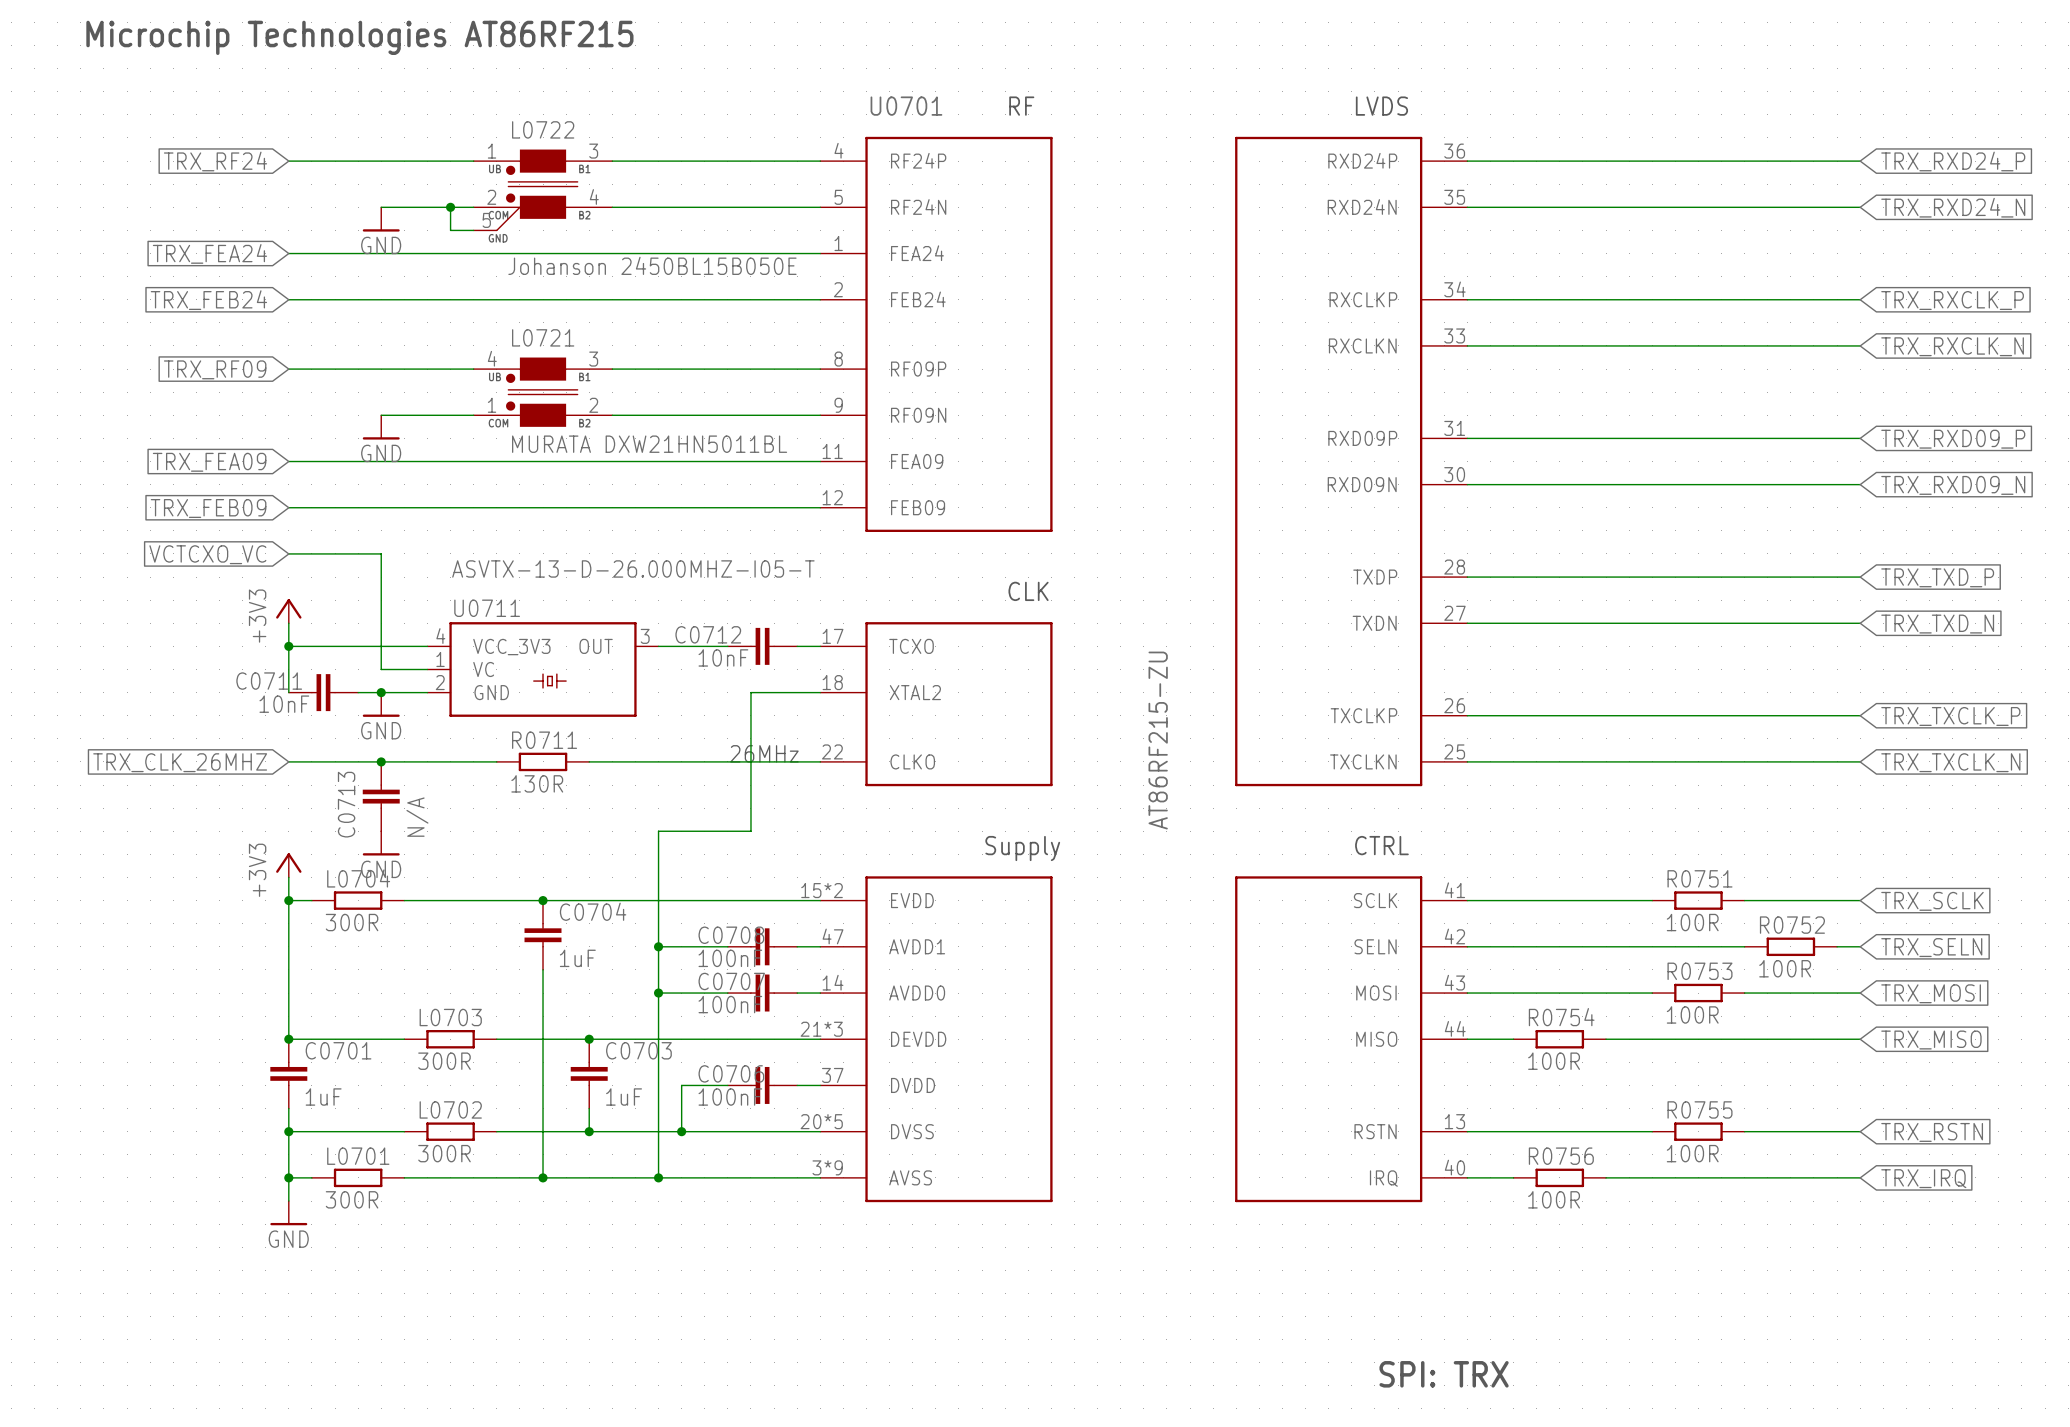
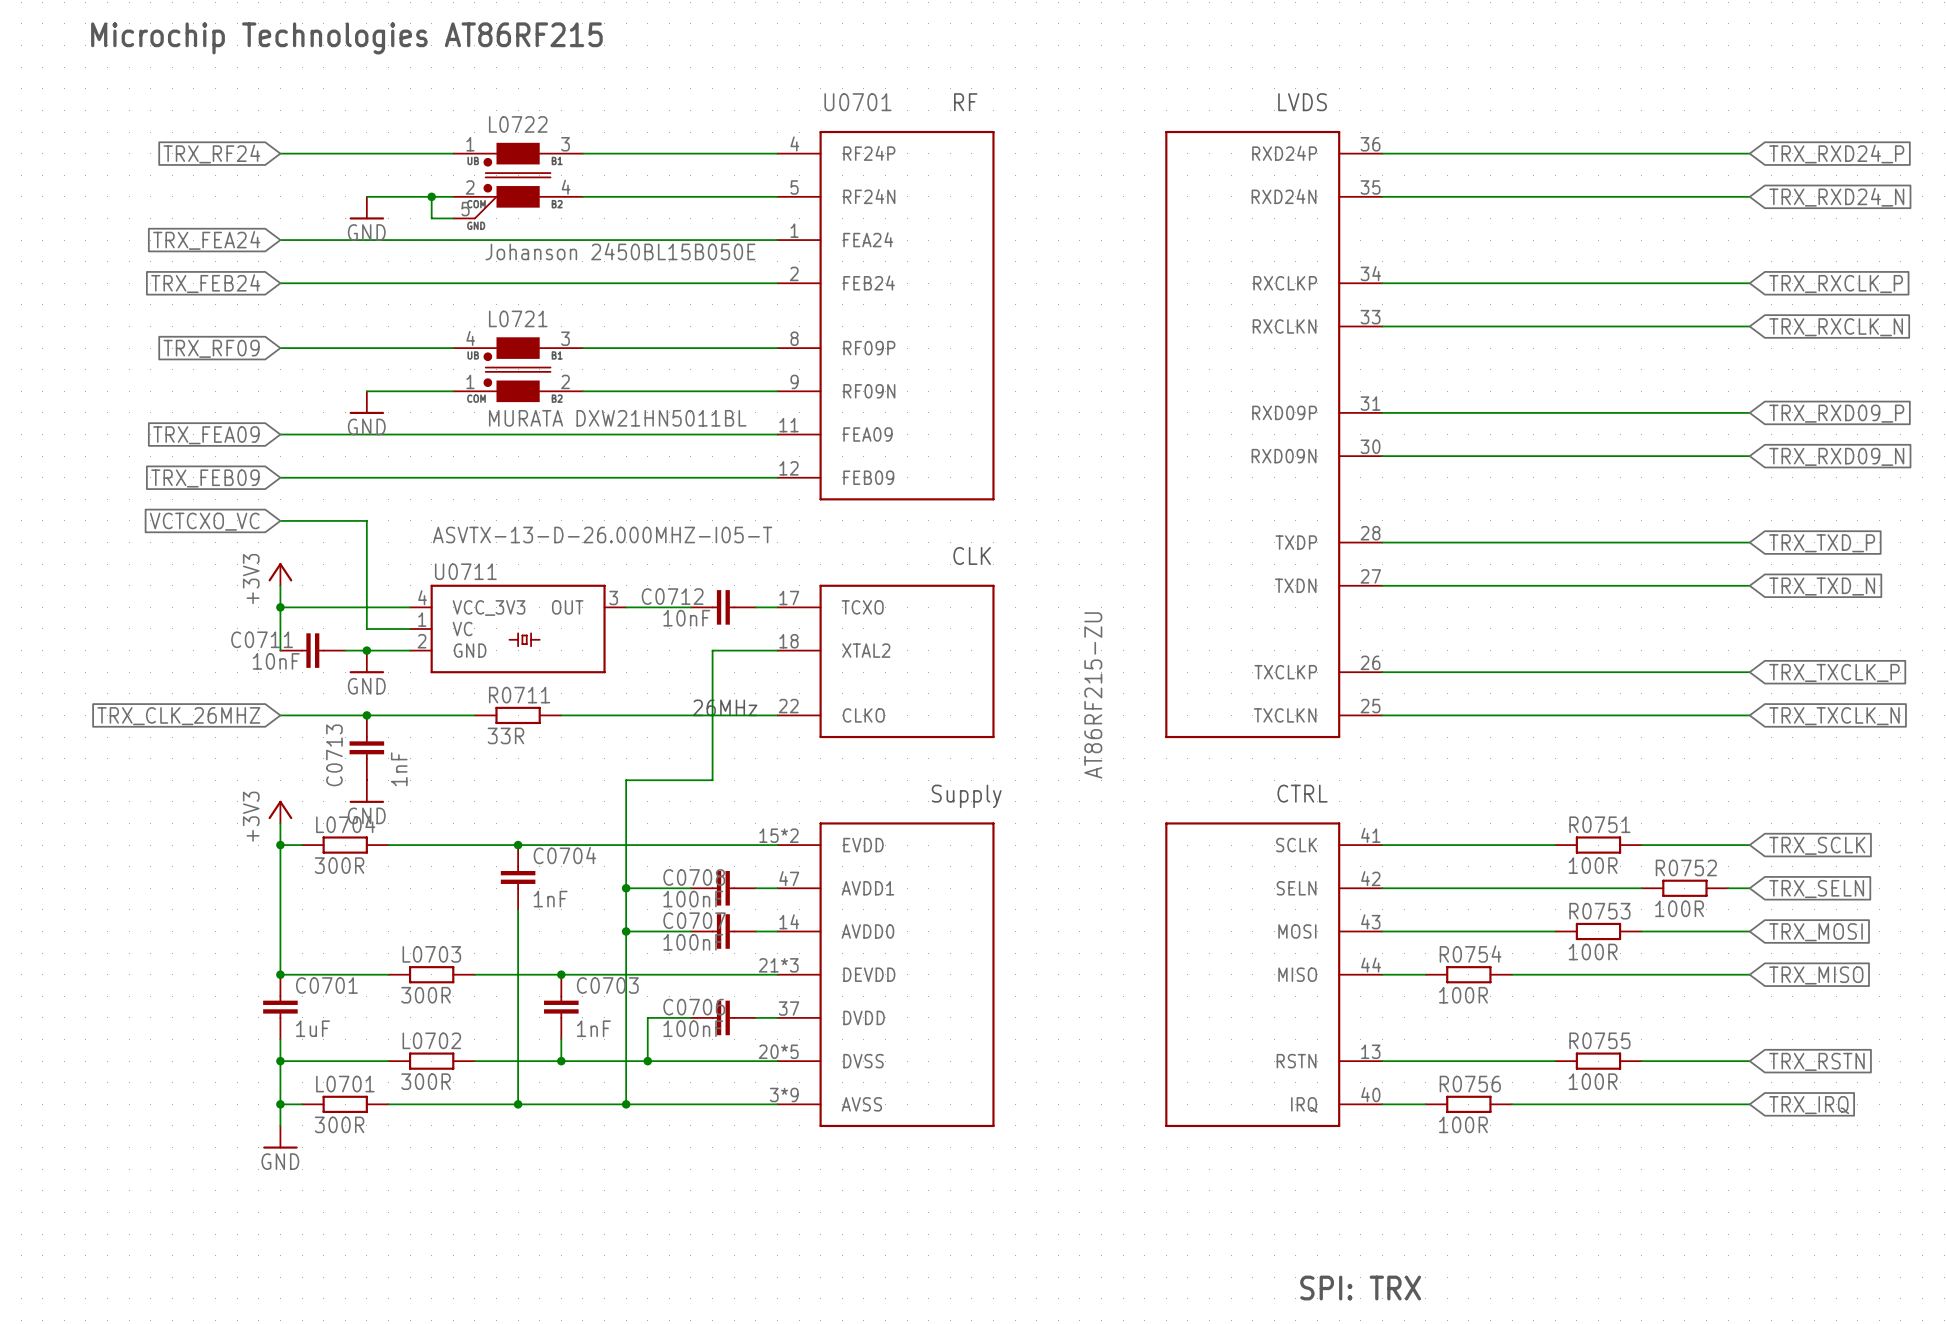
R0711 value: 130R (537, 783) -> 33R (505, 735)
C0713 value: N/A (417, 817) -> 1nF (399, 769)
C0704 value: 1uF (577, 958) -> 1nF (550, 899)
C0703 value: 1uF (624, 1097) -> 1nF (593, 1028)

